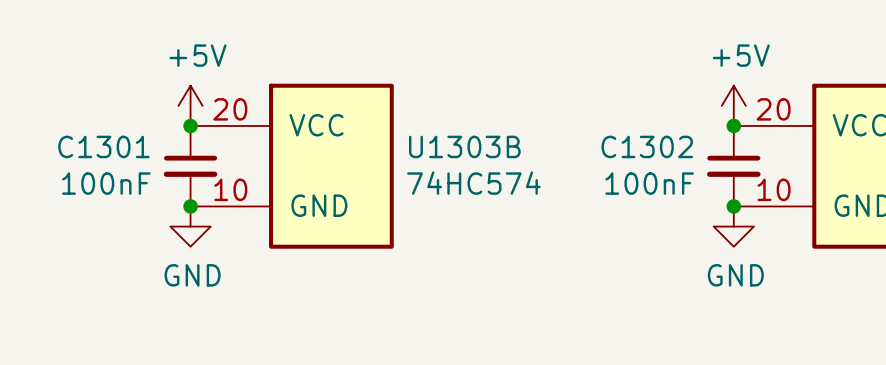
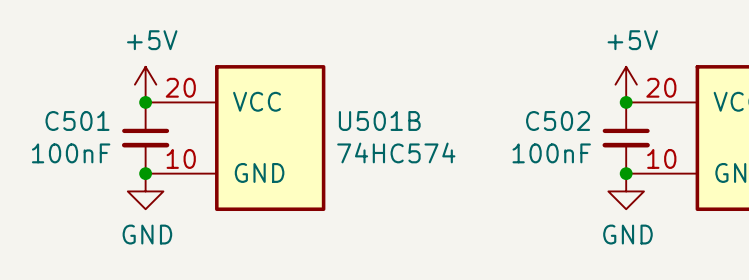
C1301 name: C1301 (103, 146) -> C501 (77, 120)
U1303B name: U1303B (464, 146) -> U501B (379, 120)
C1302 name: C1302 (647, 146) -> C502 (558, 120)

